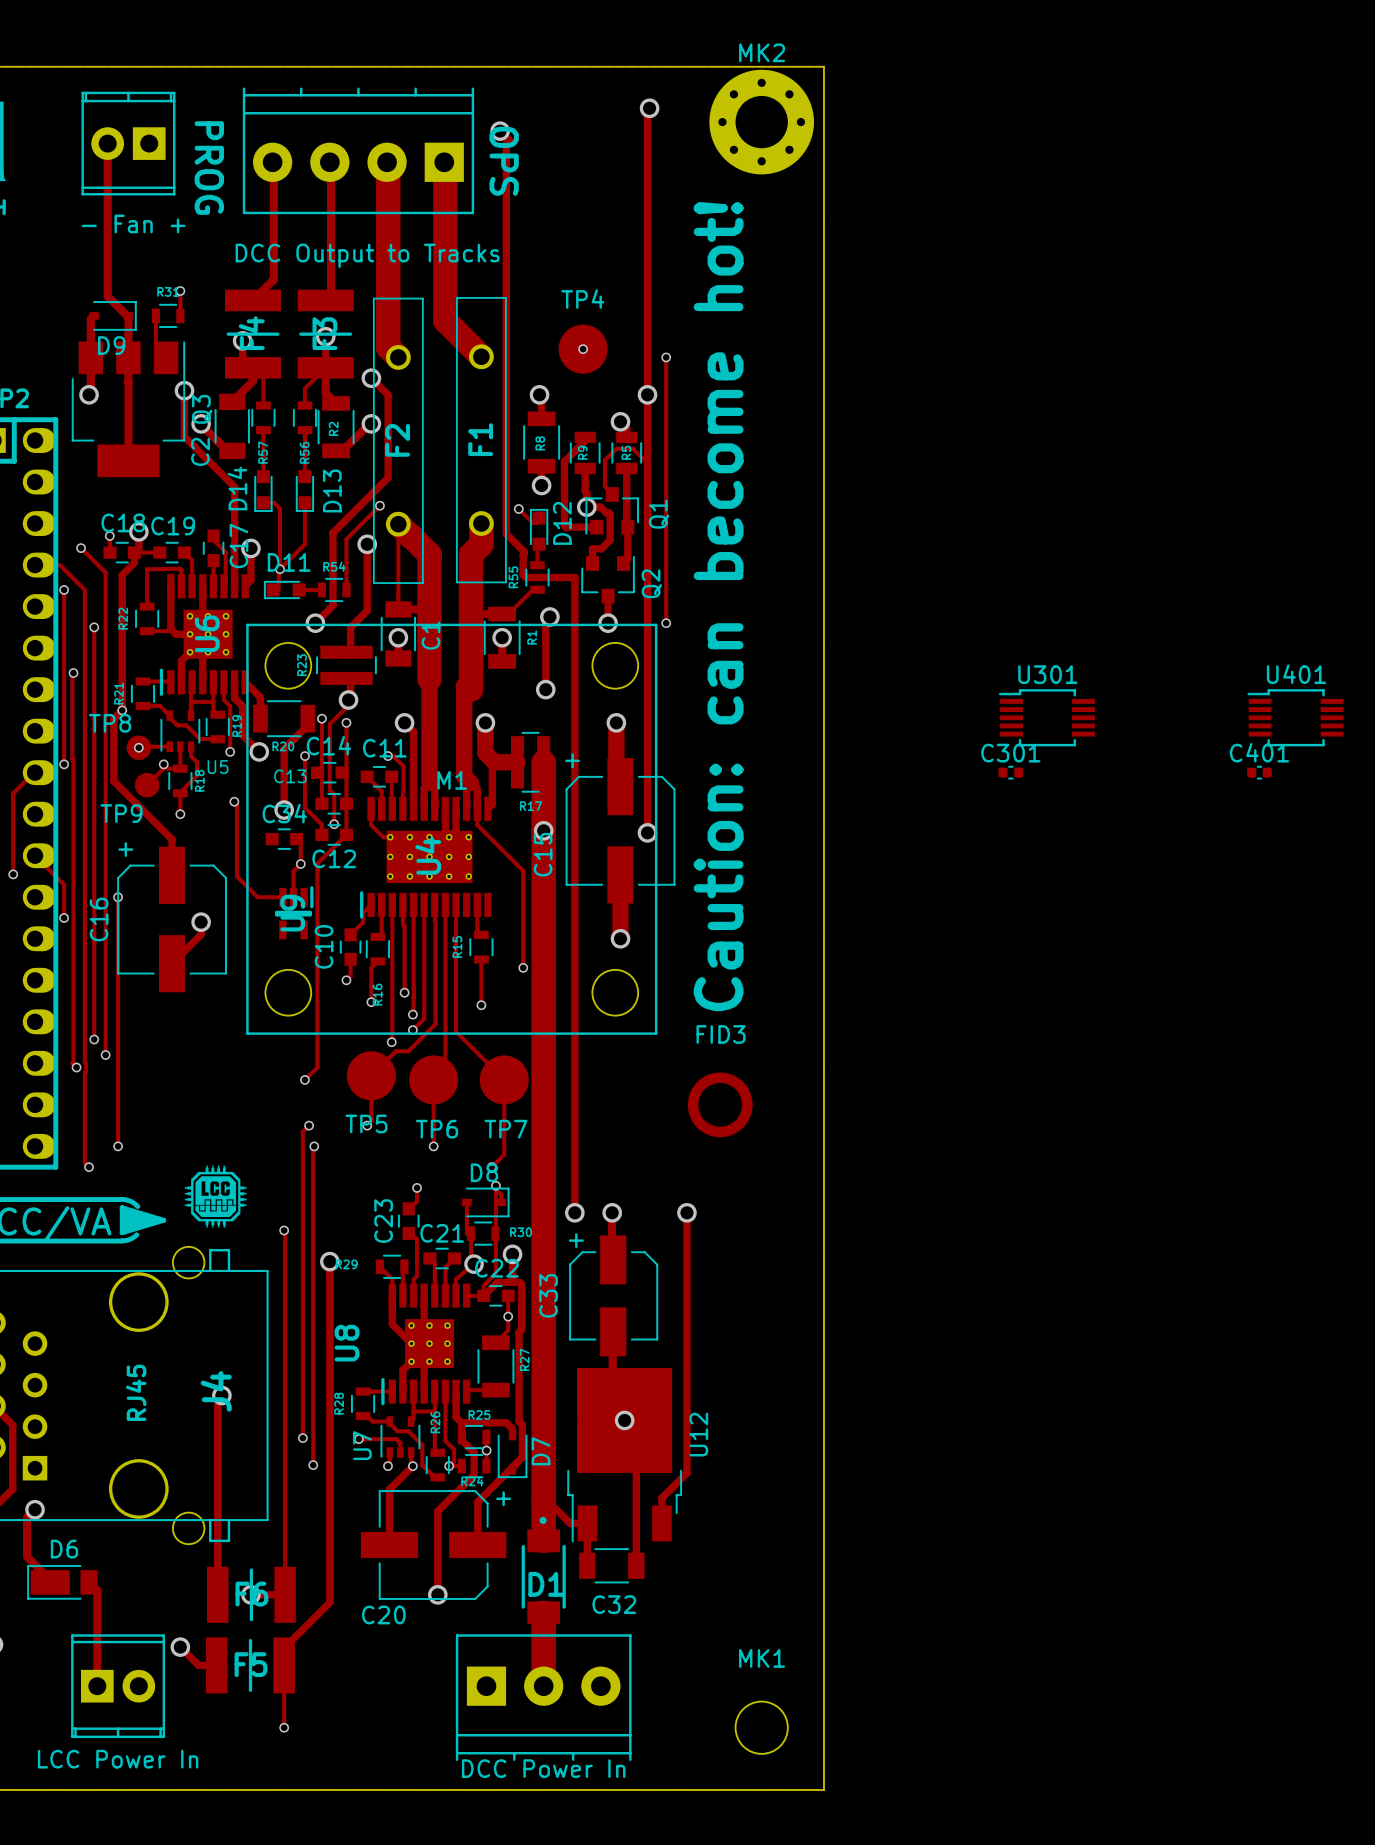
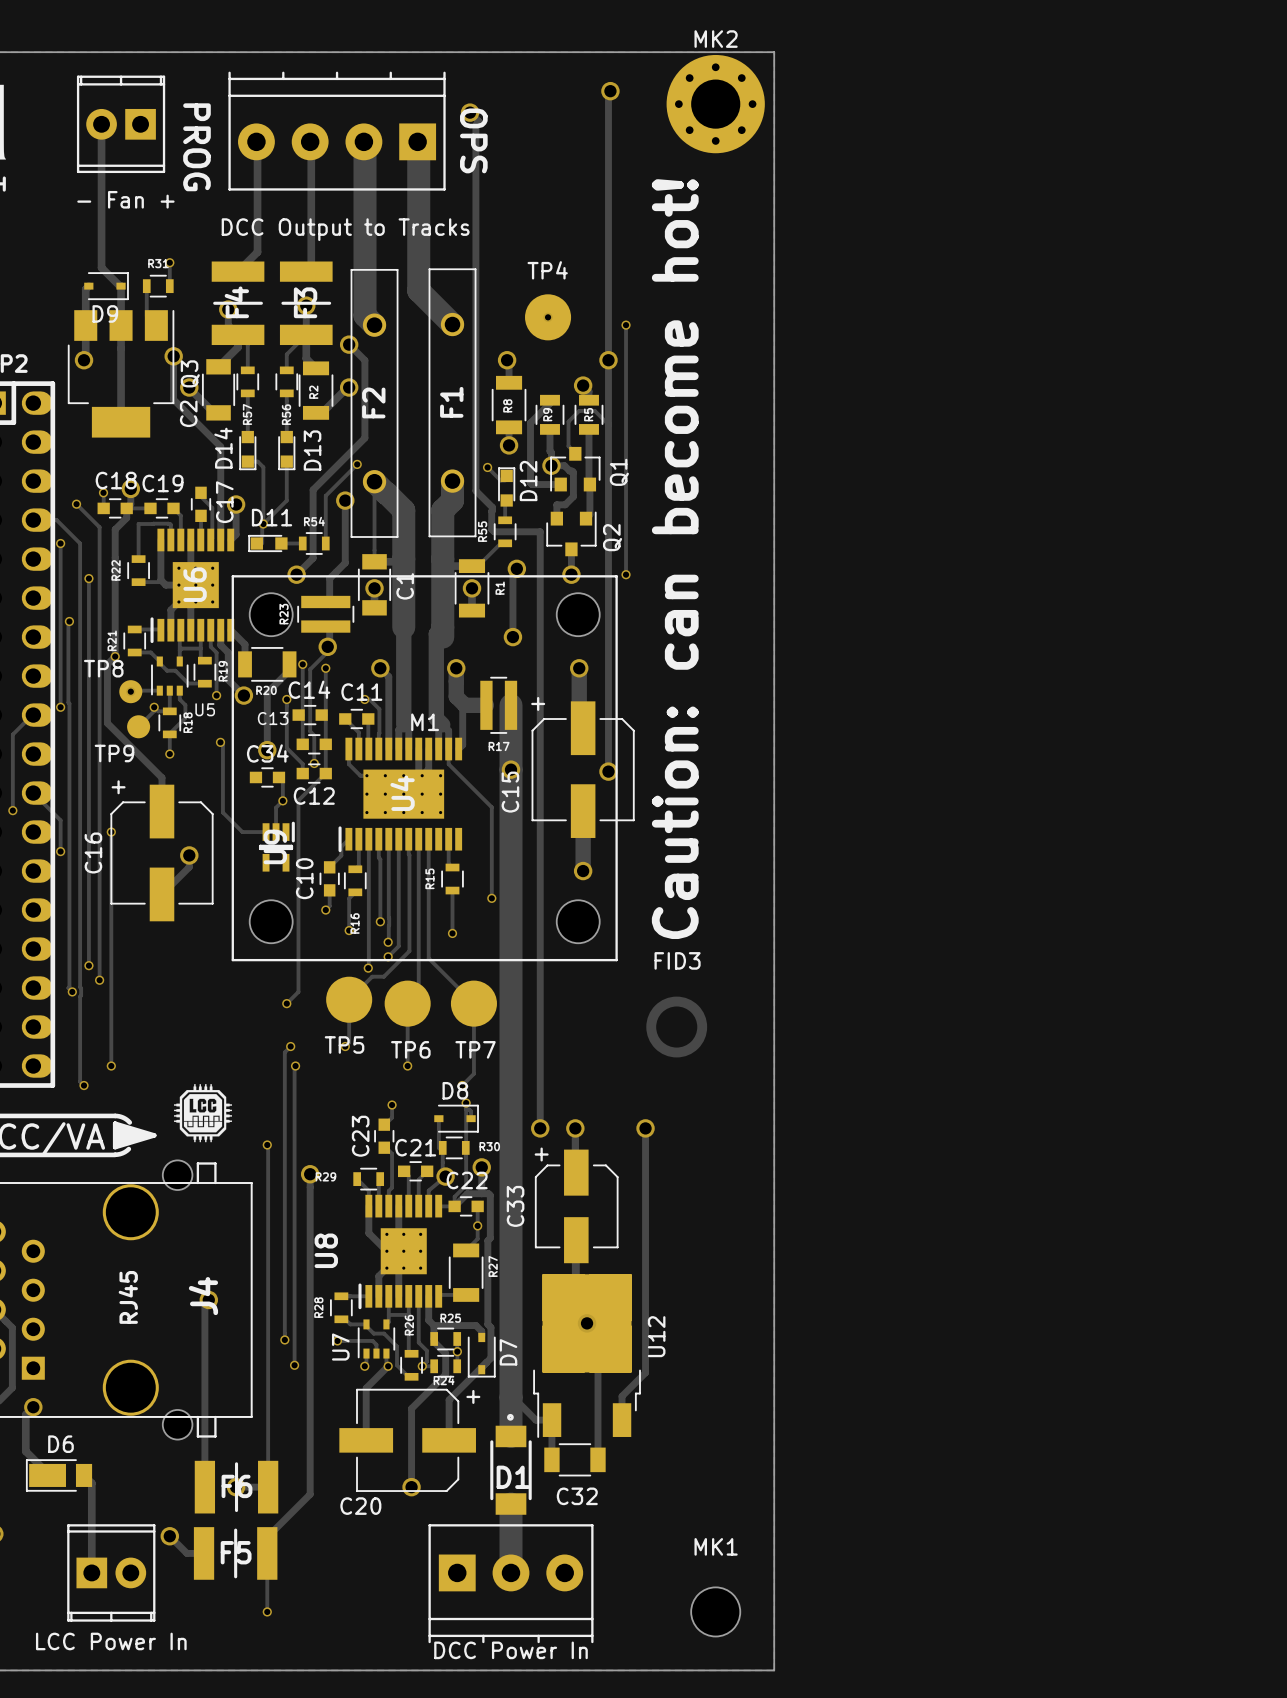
U301: (1046, 717) -> none
U401: (1295, 717) -> none
C301: (1010, 772) -> none
C401: (1259, 772) -> none

